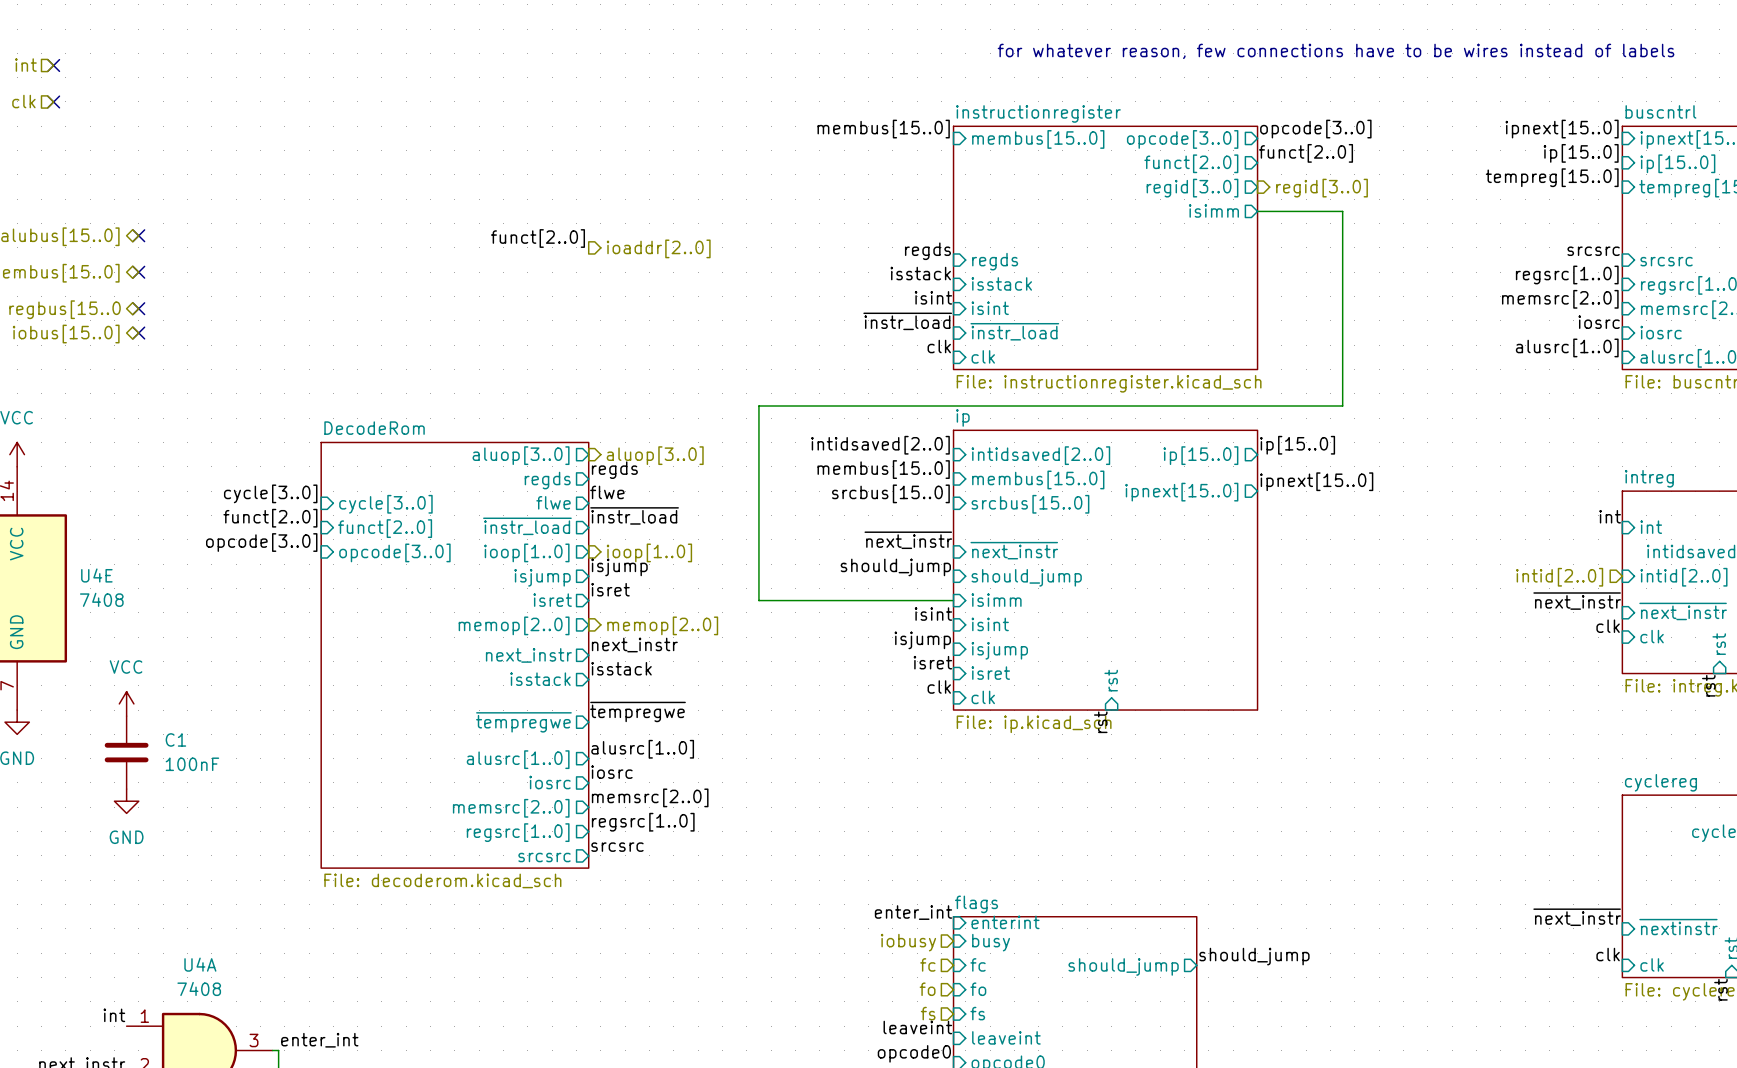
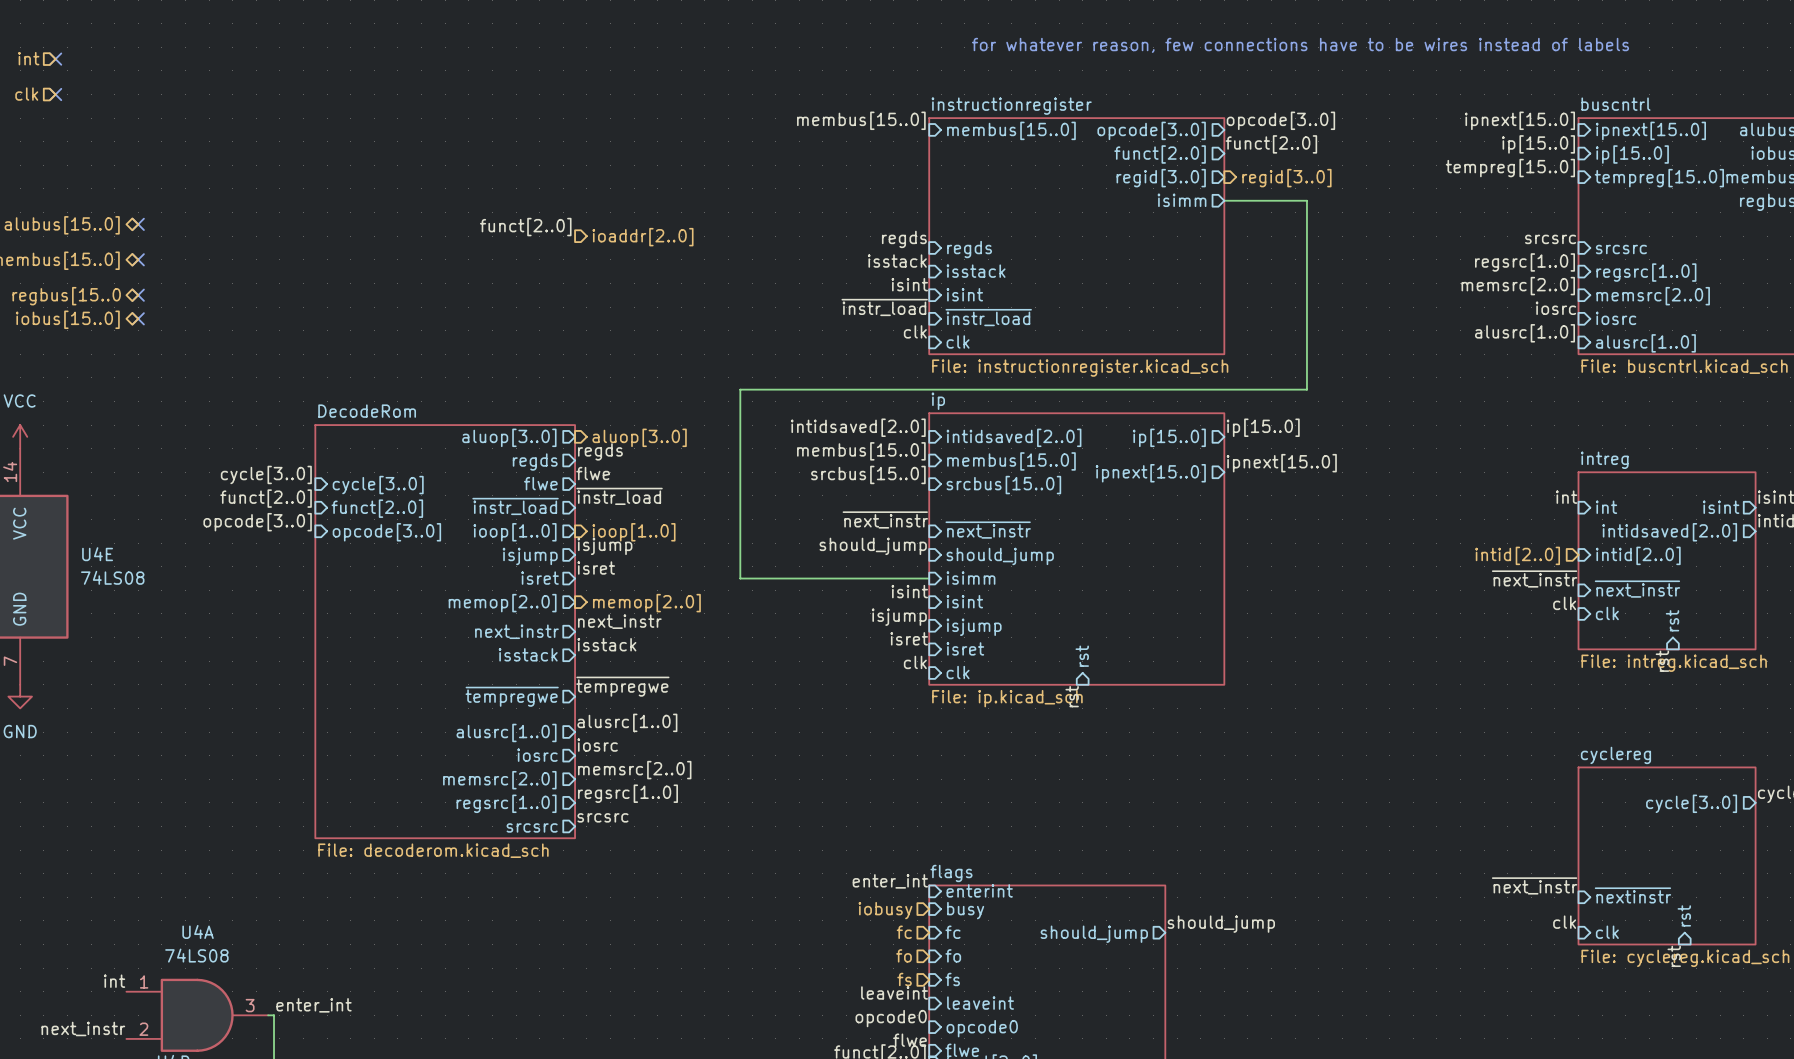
U4E value: 7408 (101, 599) -> 74LS08 (112, 577)
power symbol: VCC (126, 703) -> none
C1: 100nF (126, 752) -> none
power symbol: GND (126, 801) -> none
U4A value: 7408 (199, 988) -> 74LS08 (196, 955)

